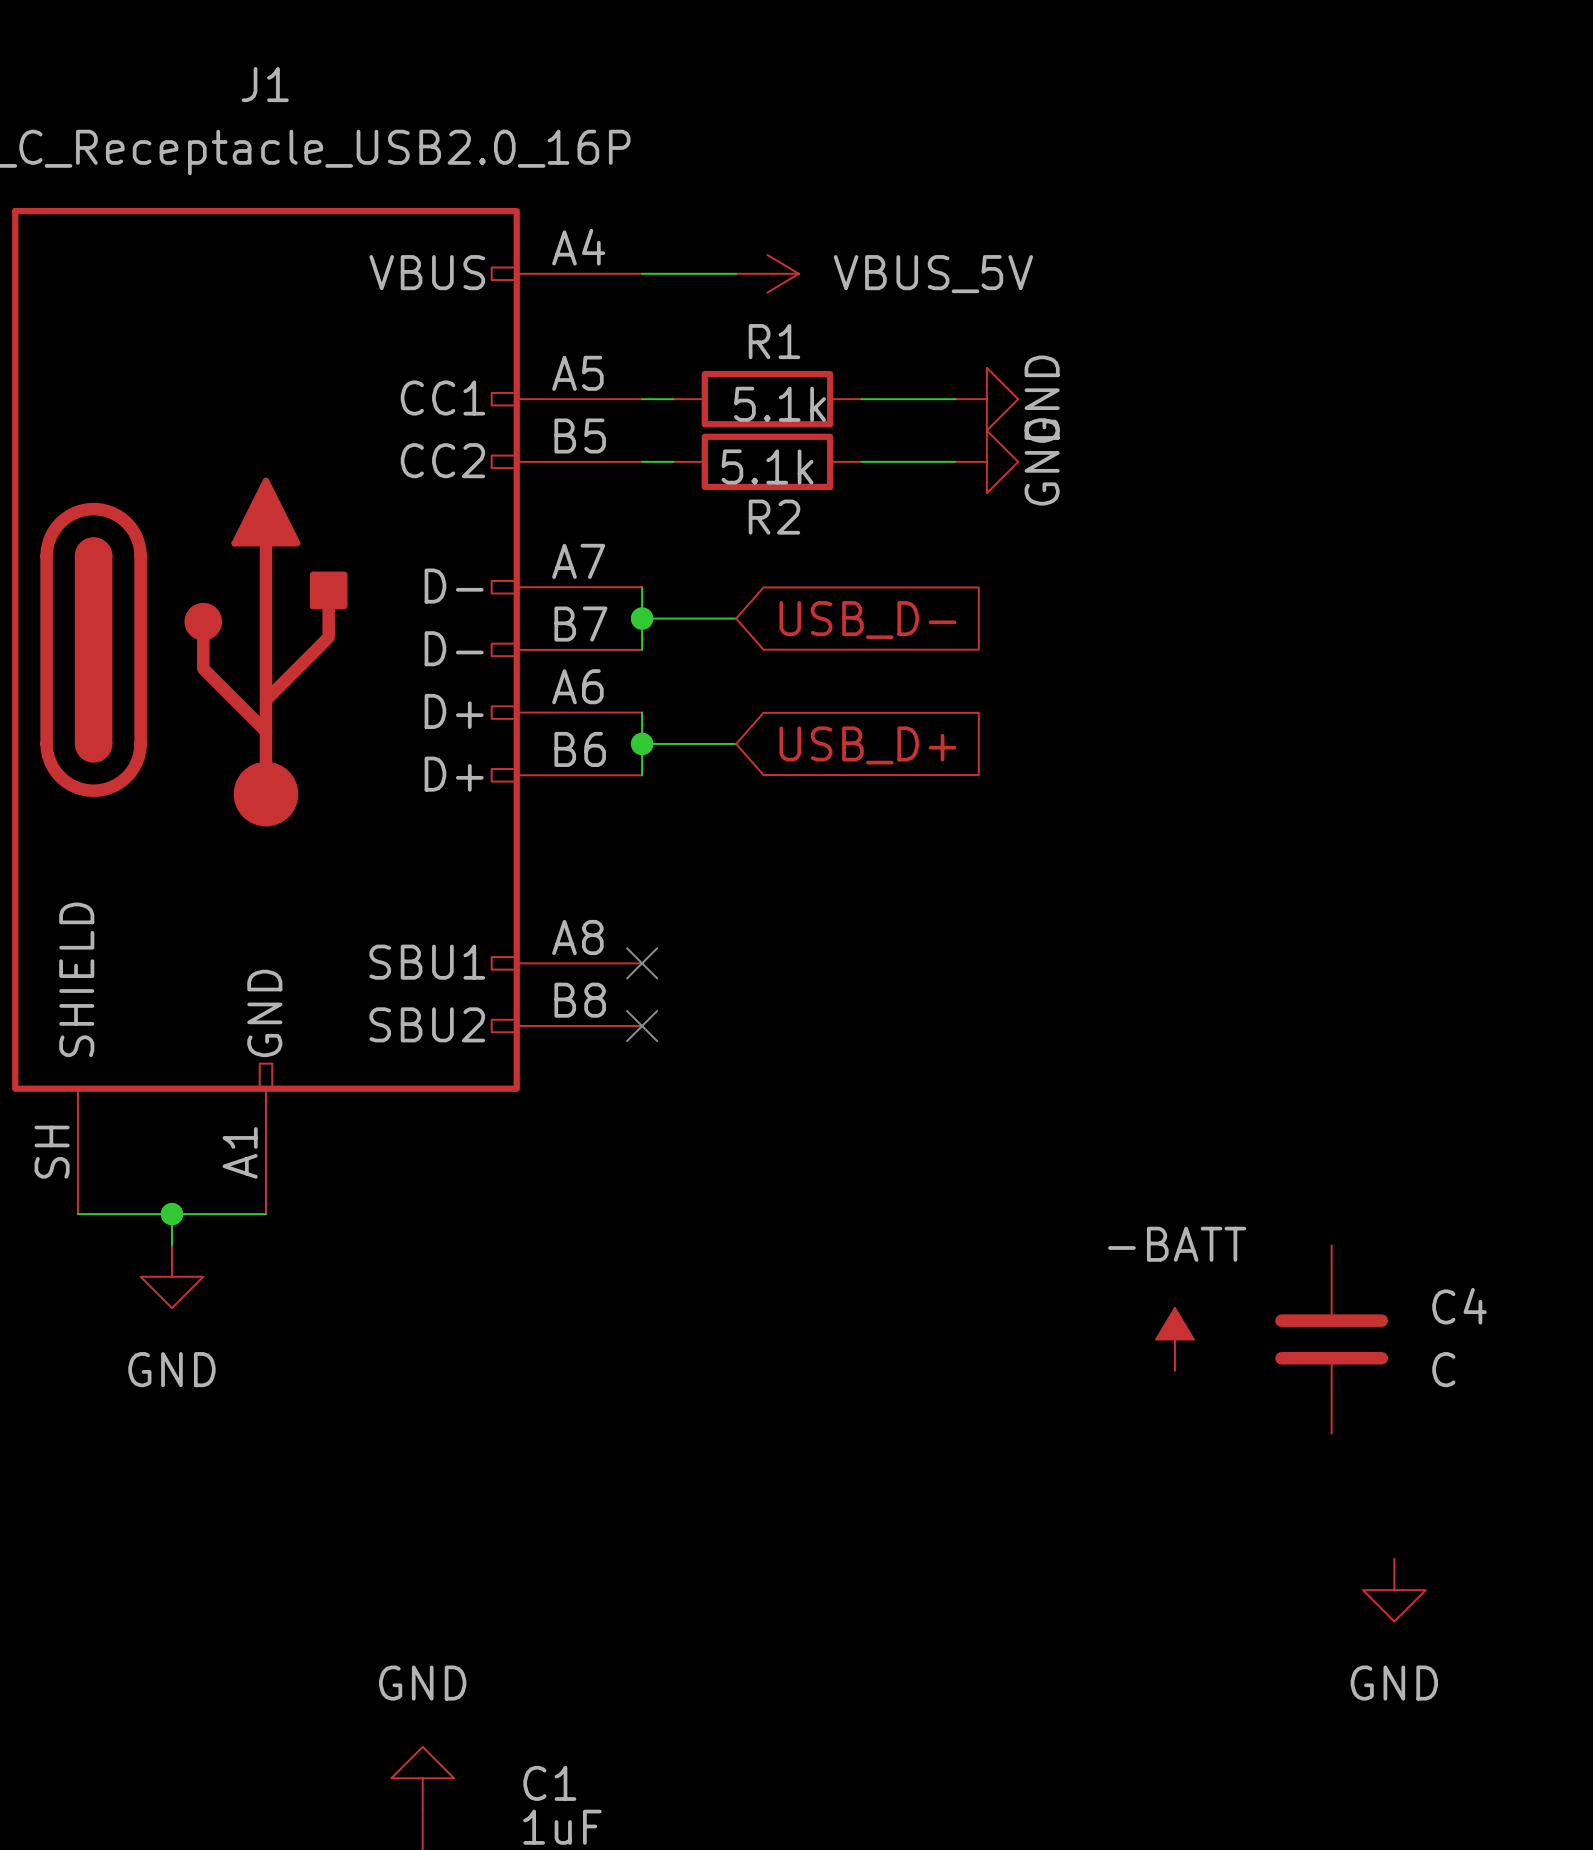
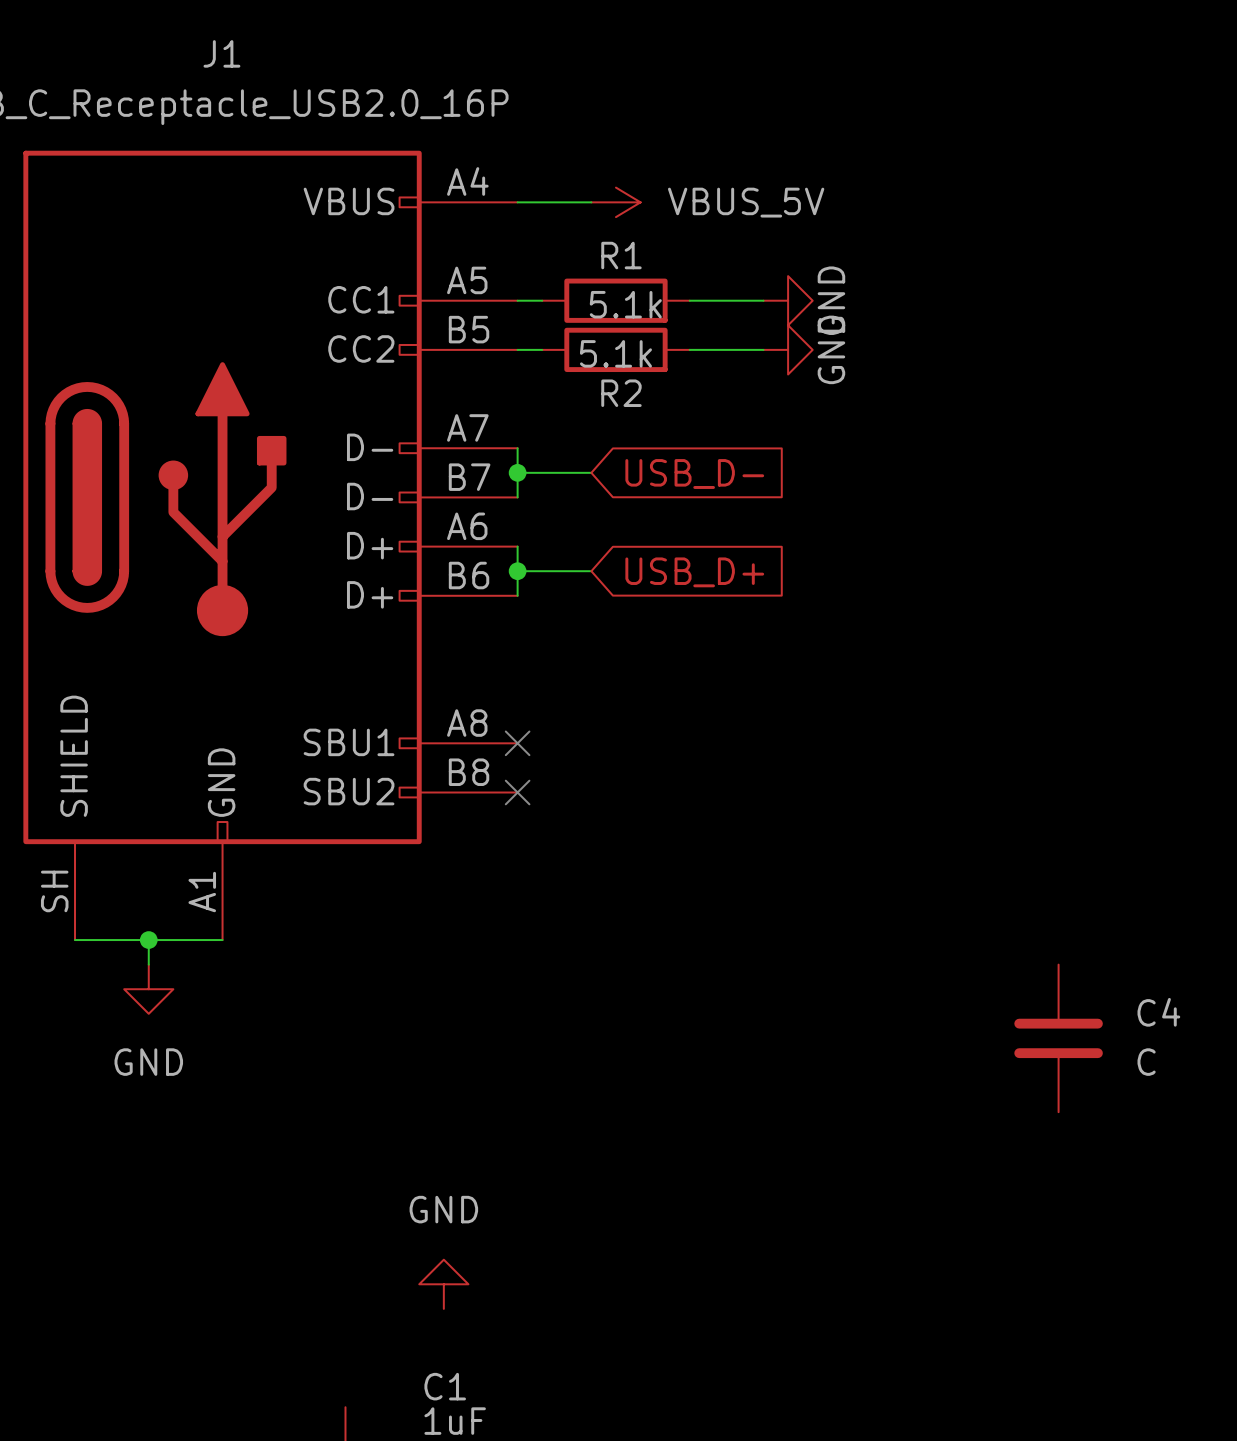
power symbol: -BATT (1174, 1339) -> none
power symbol: GND (1394, 1590) -> none
power symbol position: GND (422, 1778) -> GND (443, 1284)

